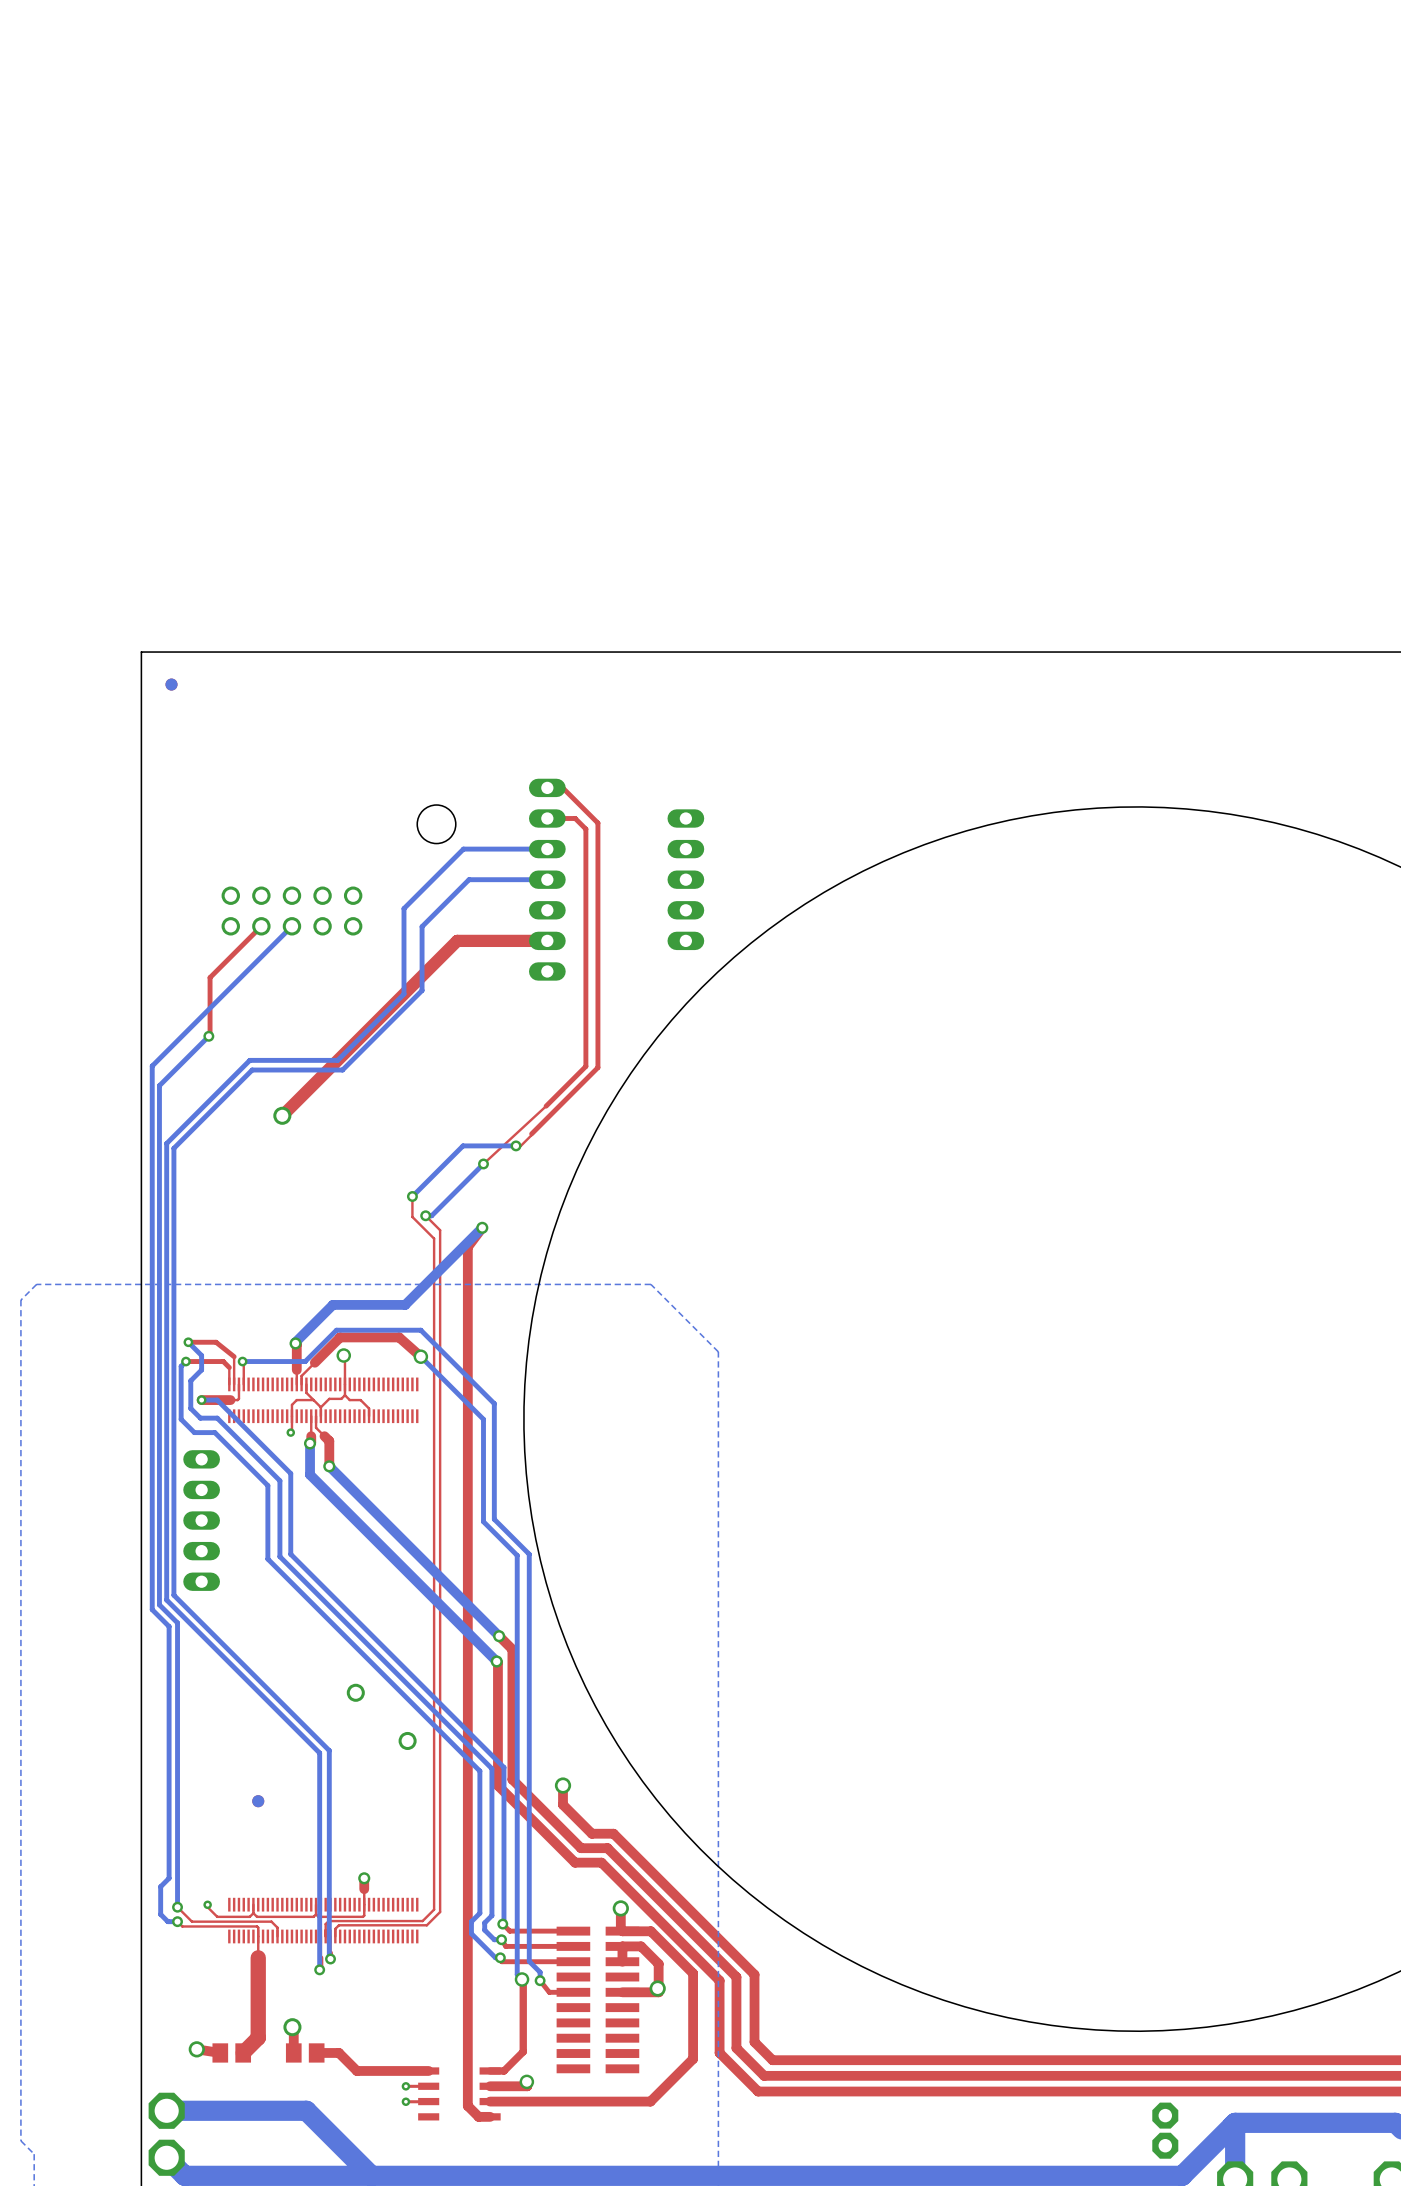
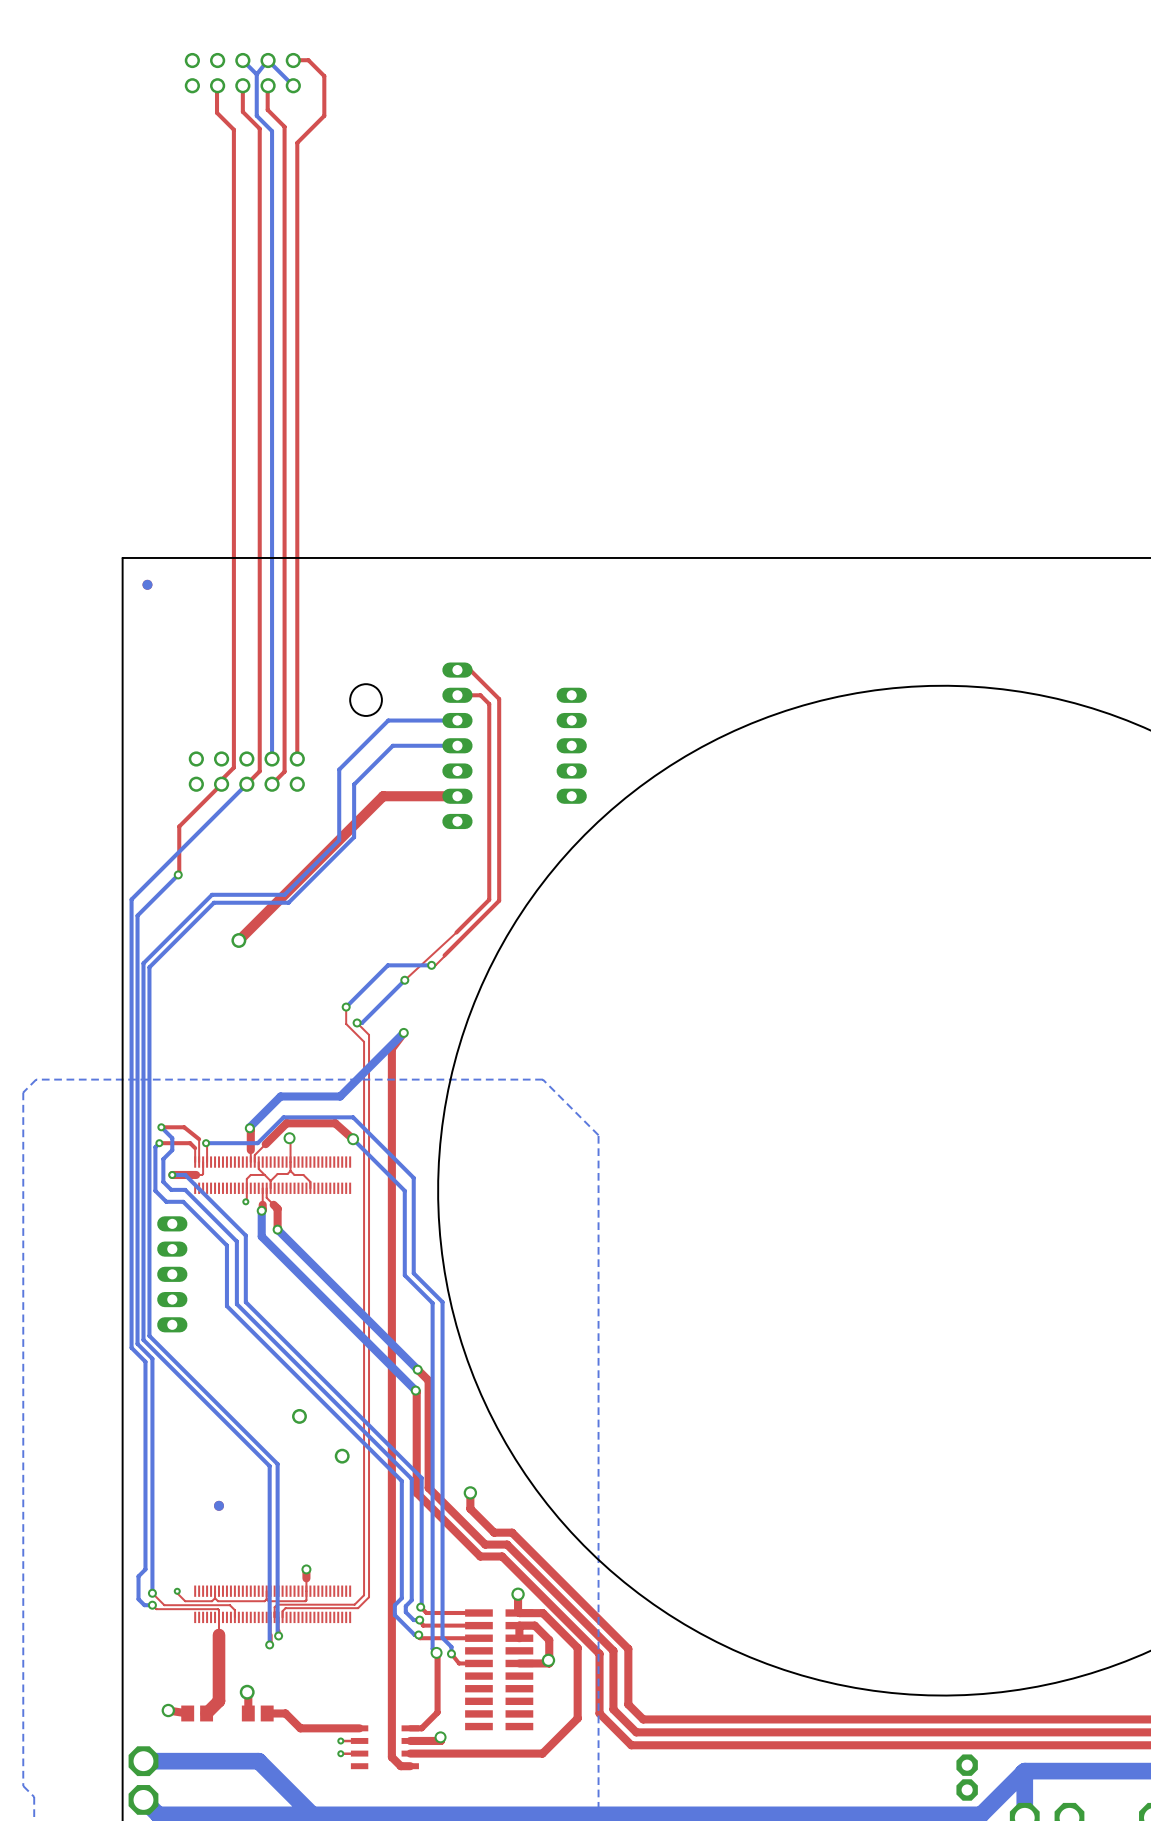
bottom track: none -> (242, 60) (256, 74)
top track: none -> (293, 60) (308, 60) (324, 76) (324, 115) (297, 142) (297, 758)
part: none -> (242, 73)
bottom track: none -> (256, 74) (256, 115) (272, 131) (272, 758)
bottom track: none -> (256, 74) (268, 60) (293, 85)
top track: none -> (217, 85) (217, 112) (233, 129) (233, 767) (221, 779) (221, 784)
top track: none -> (242, 85) (242, 111) (259, 128) (259, 771) (246, 784)
top track: none -> (268, 85) (267, 109) (284, 126) (284, 771) (272, 784)

